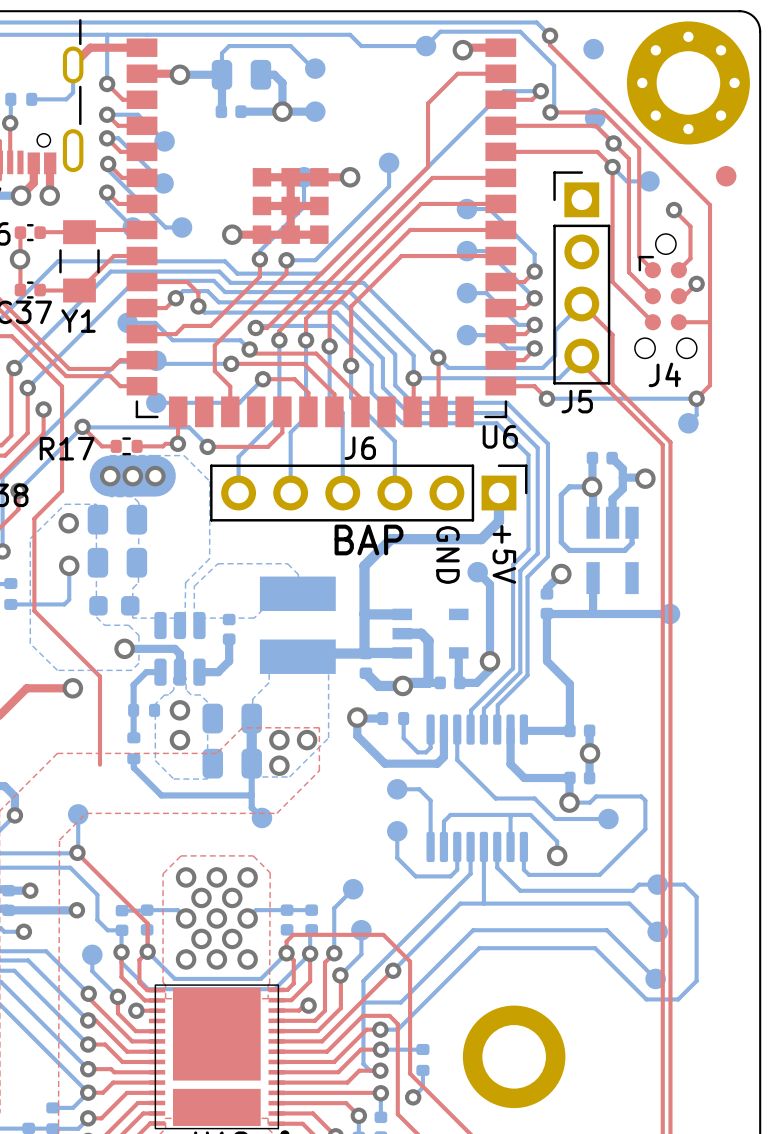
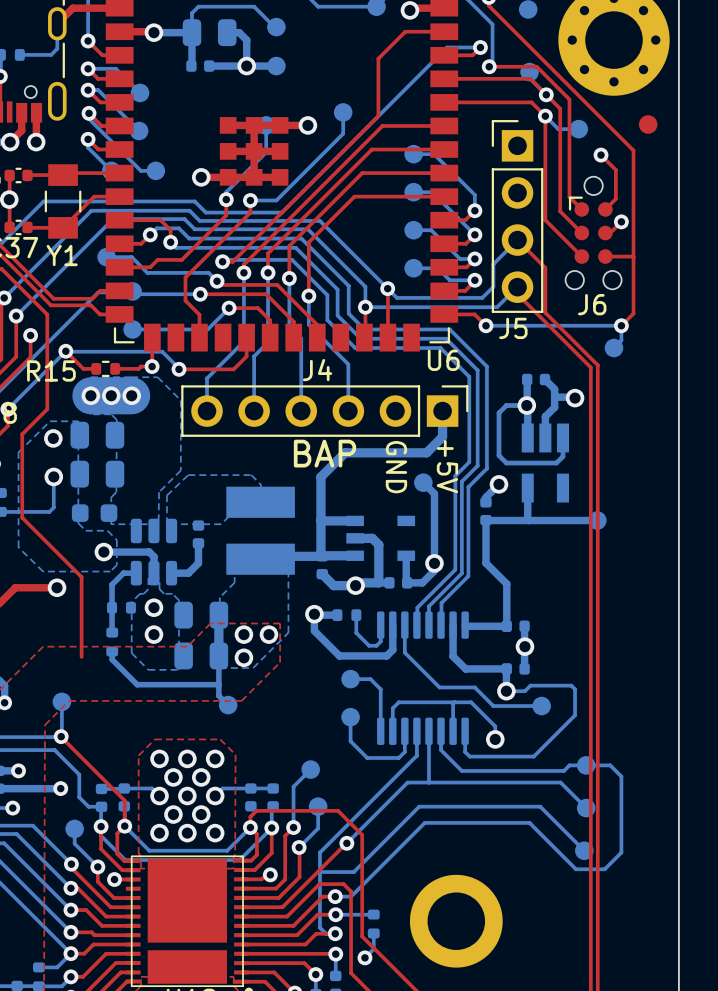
J4 name: J4 (664, 374) -> J6 (592, 304)
R17 name: R17 (67, 448) -> R15 (51, 370)
J6 name: J6 (360, 448) -> J4 (317, 370)

